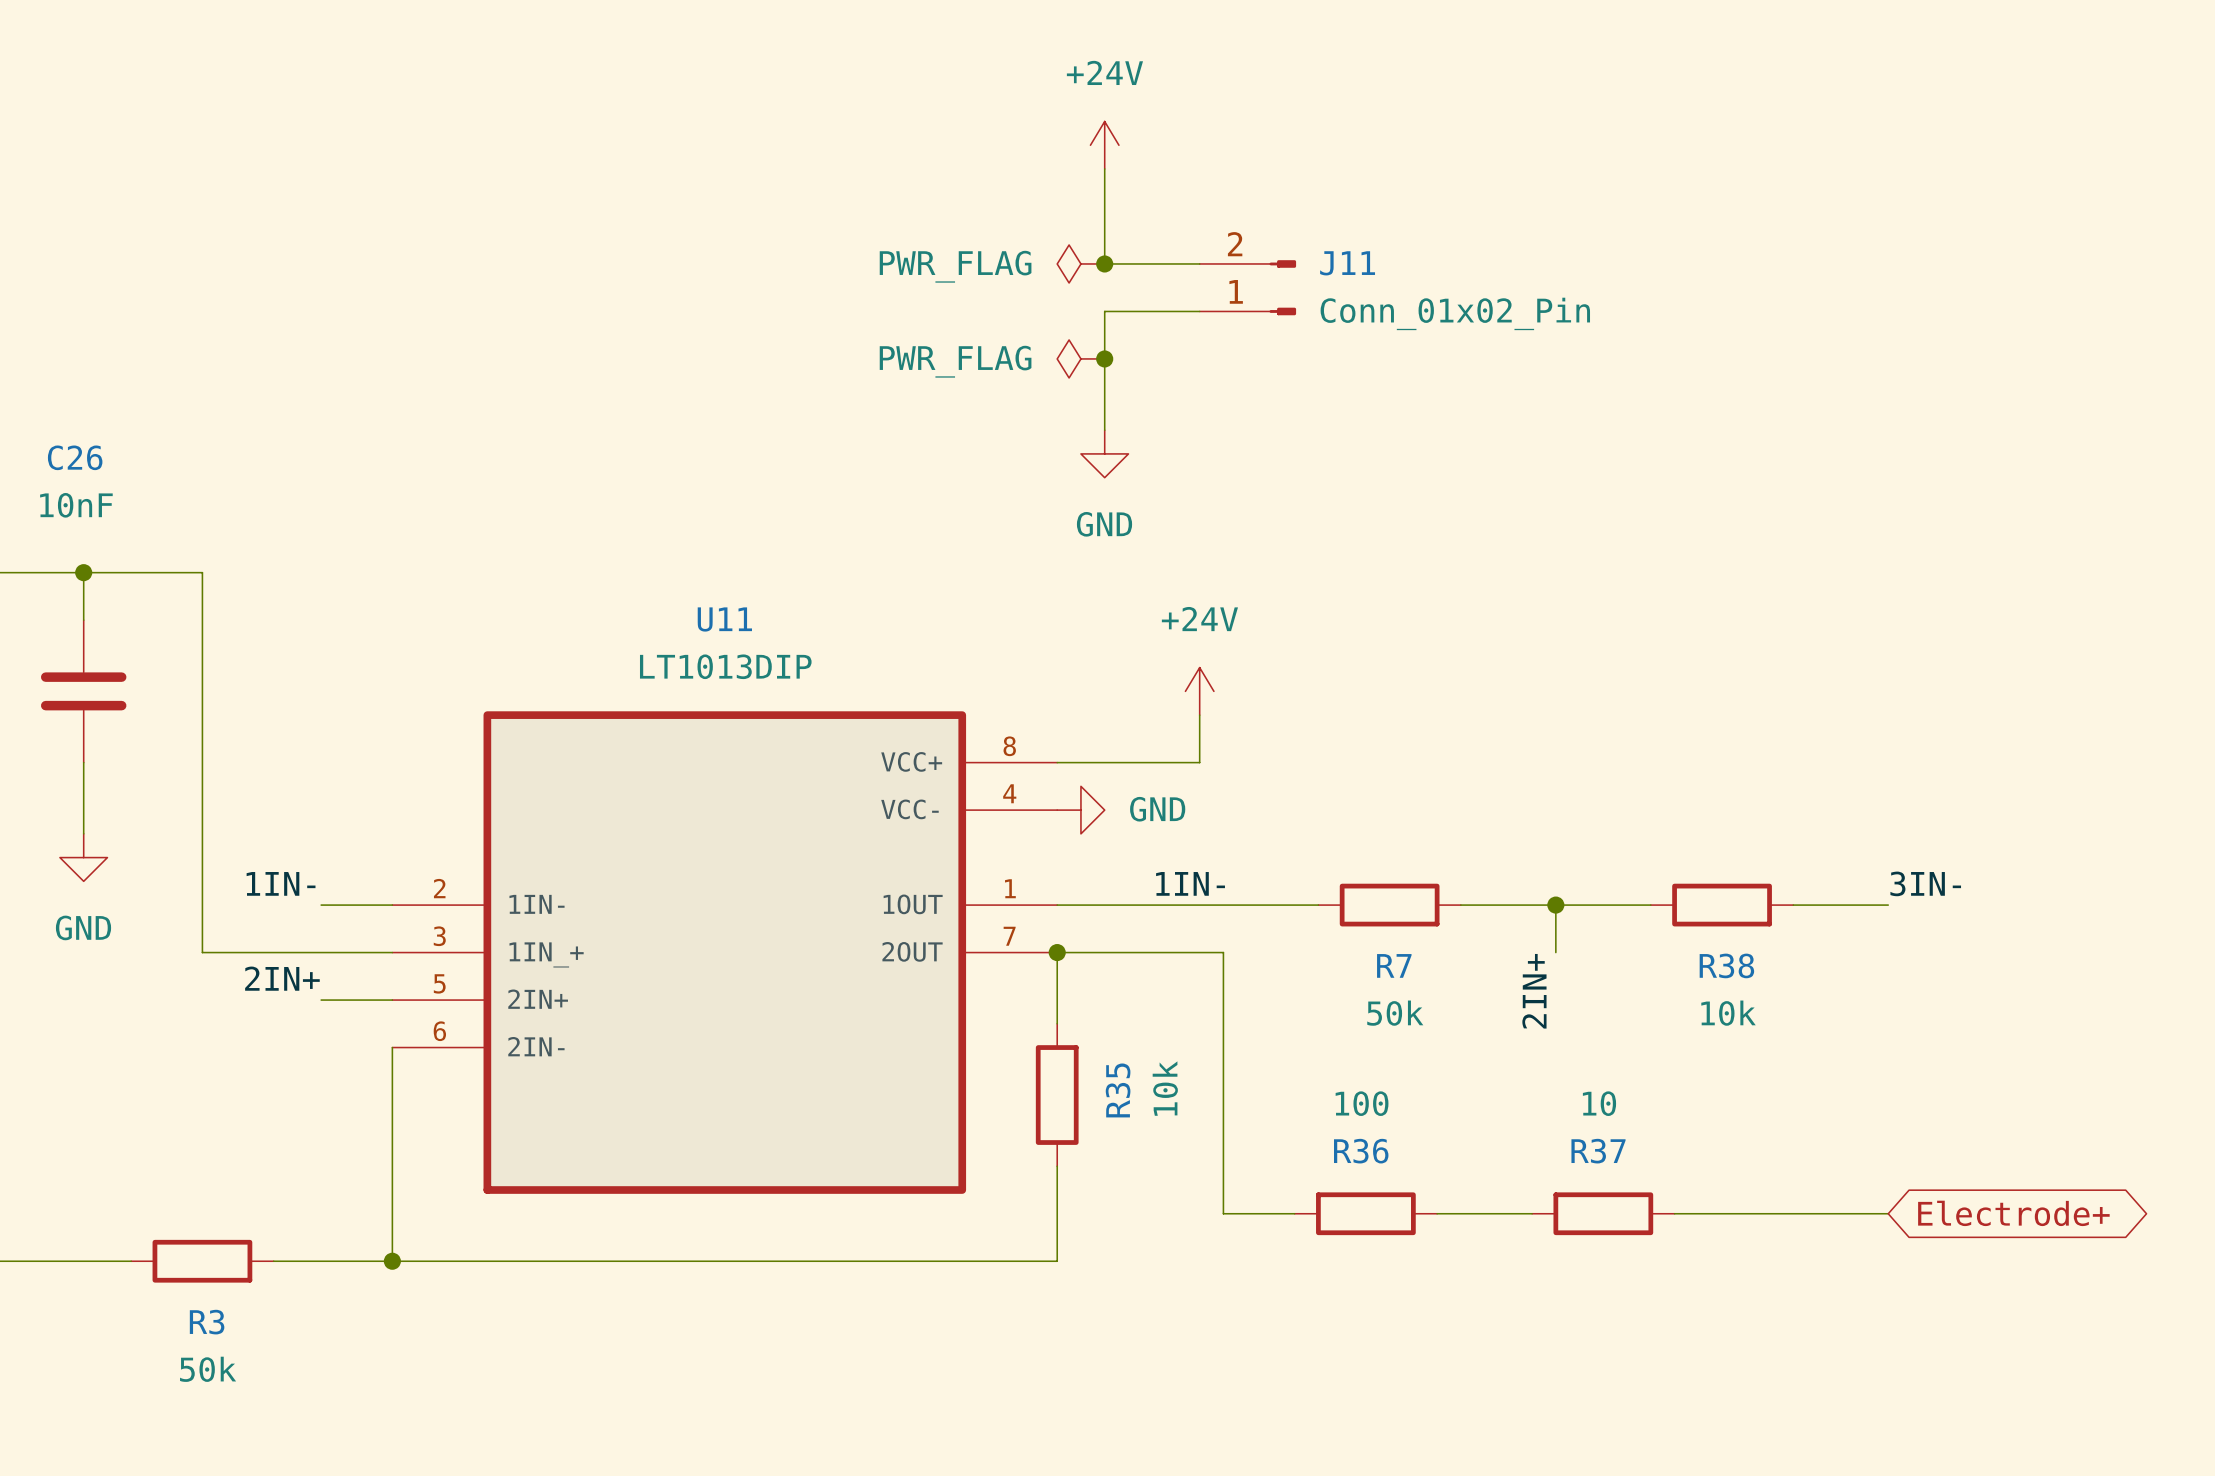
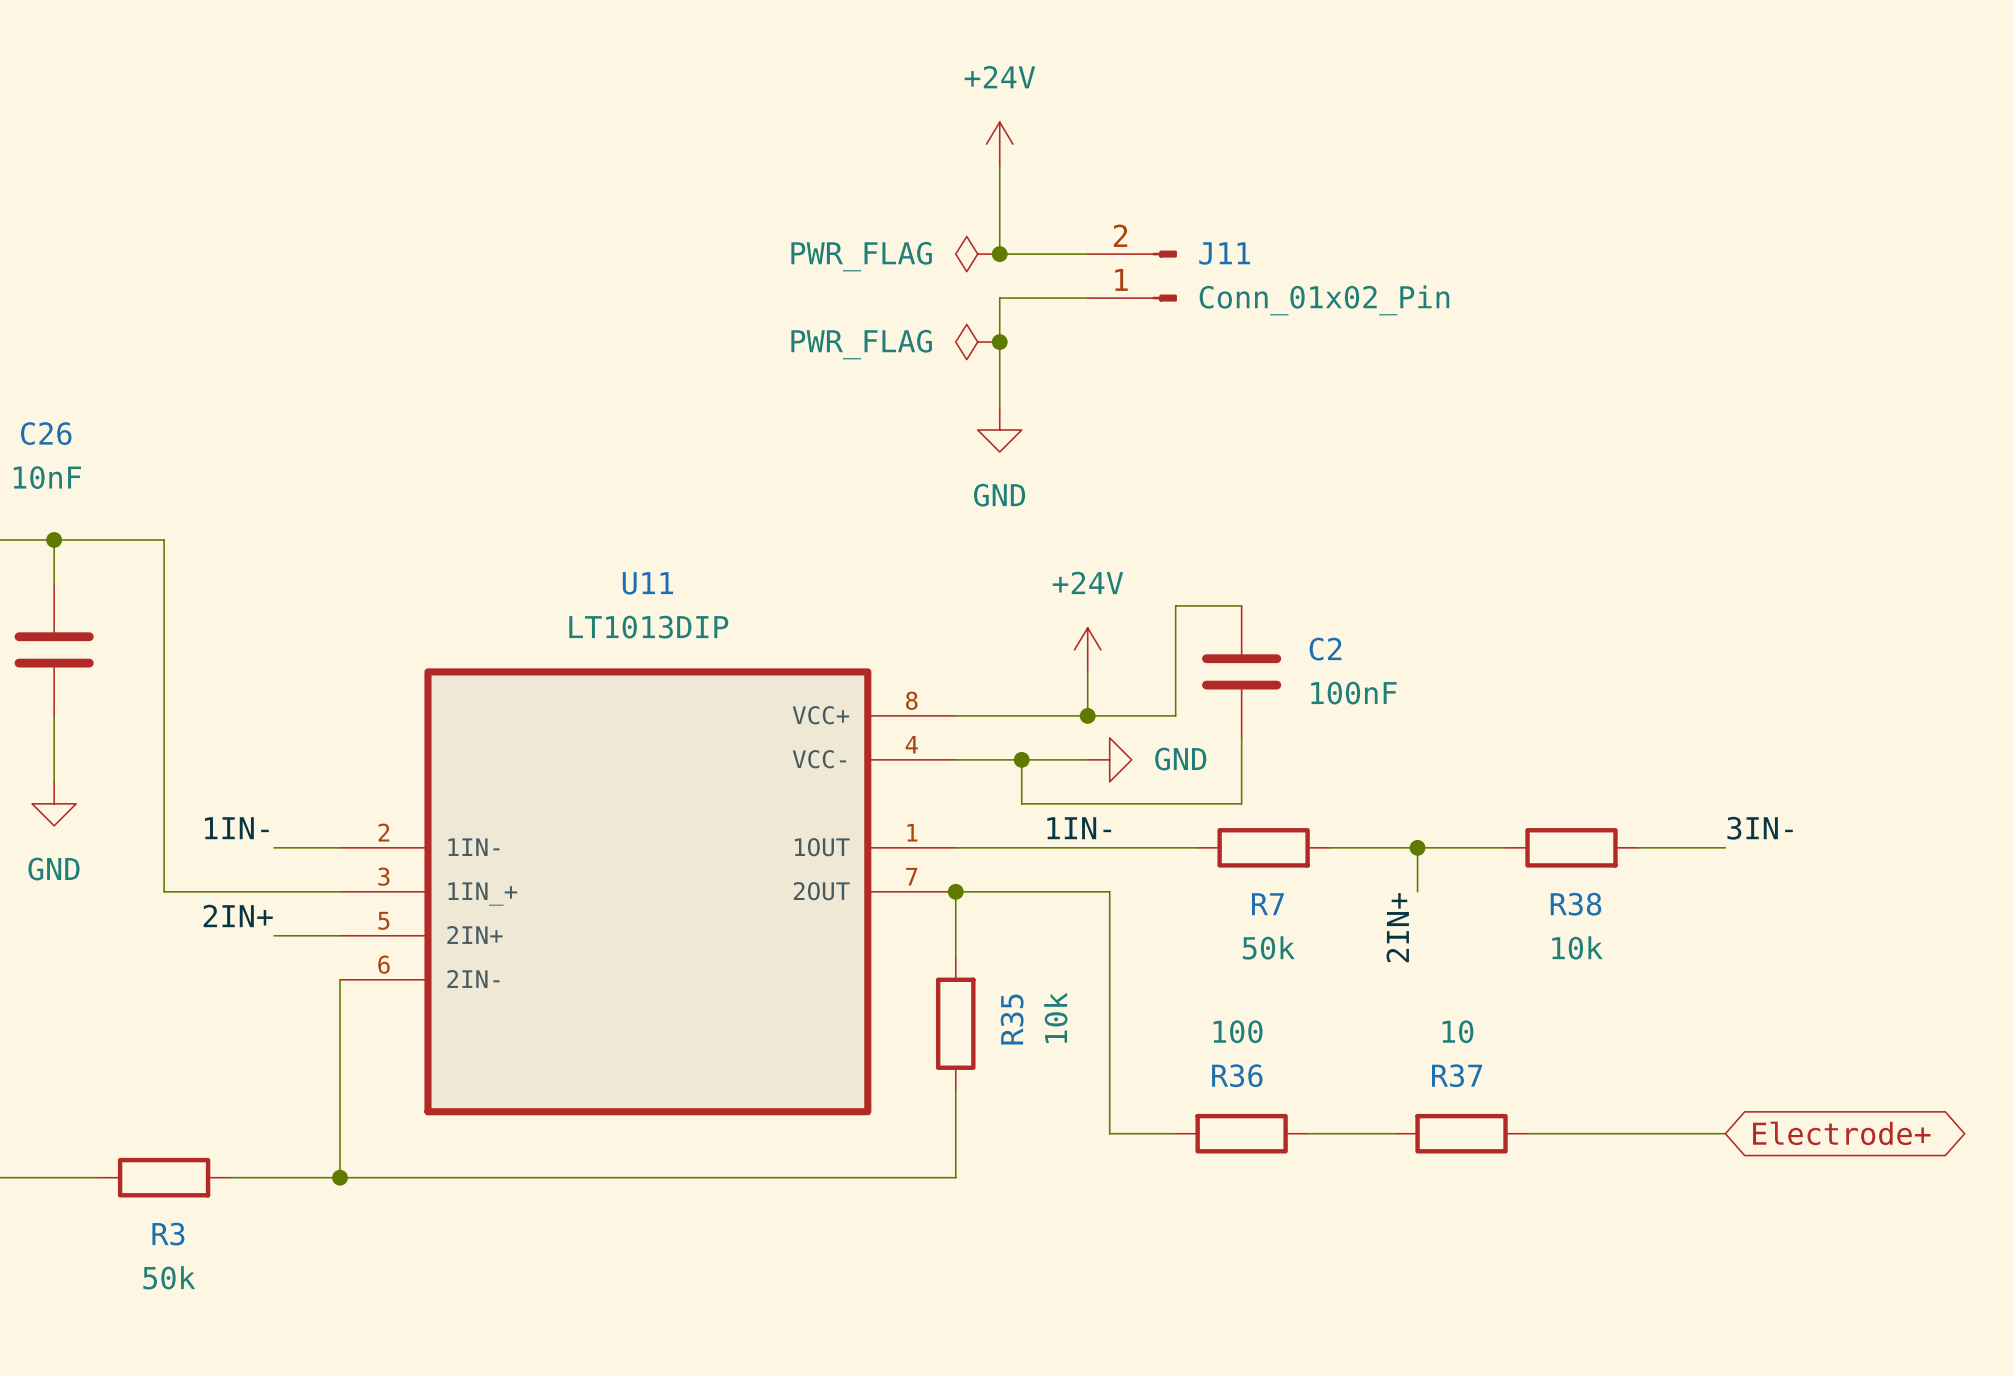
wire: none -> (1241, 605) (1175, 605) (1175, 715) (1087, 715)
C2: none -> 100nF (1241, 671)
junction: none -> (1087, 715)
wire: none -> (1241, 737) (1241, 803) (1021, 803) (1021, 759)
wire: none -> (955, 759) (1087, 759)
power symbol position: GND (1080, 810) -> GND (1109, 759)
junction: none -> (1021, 759)

